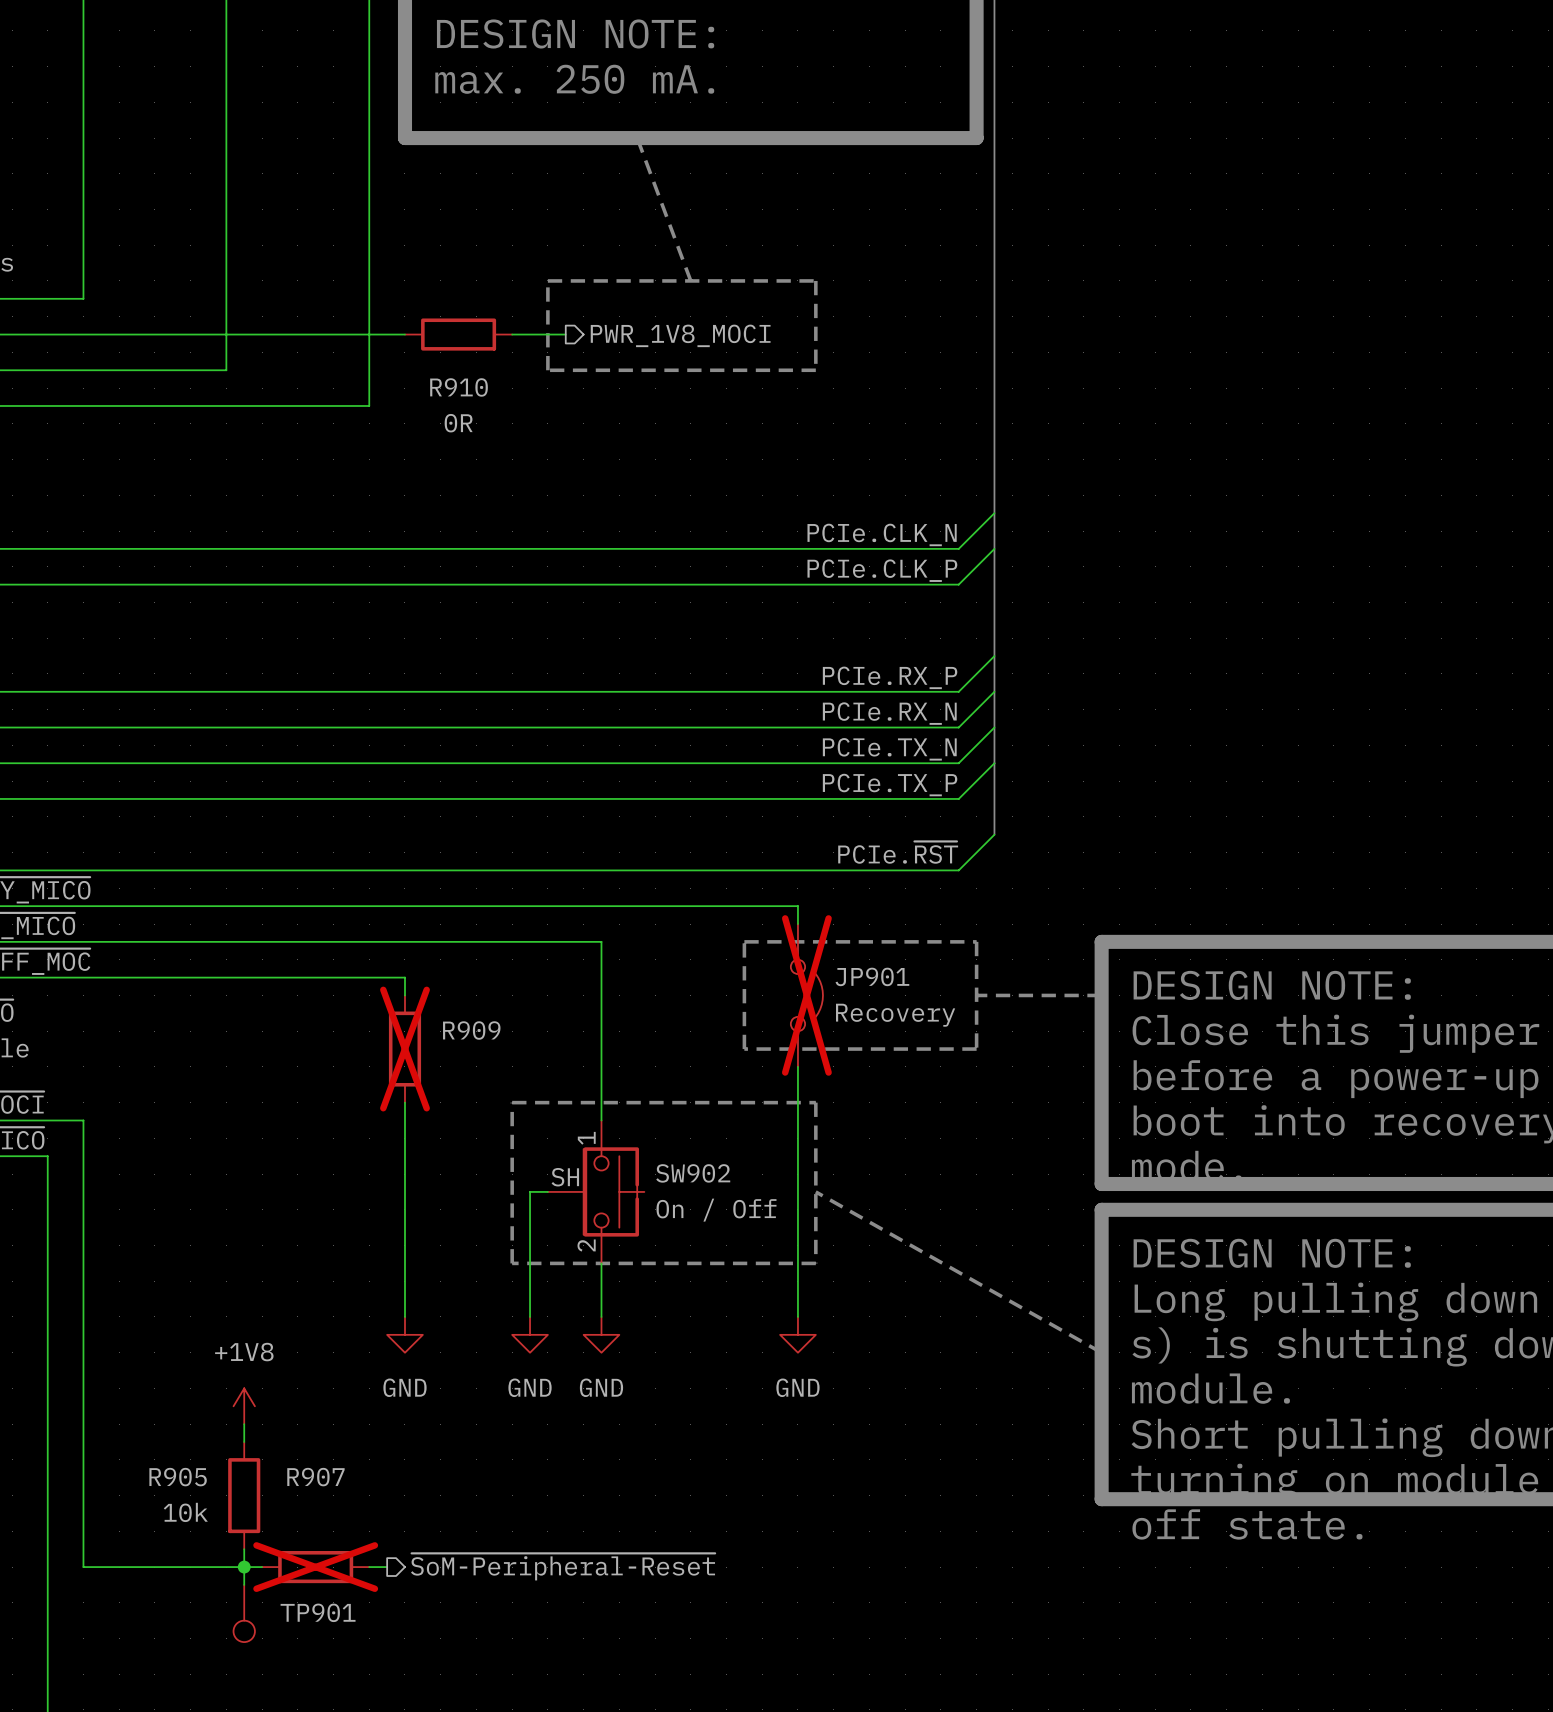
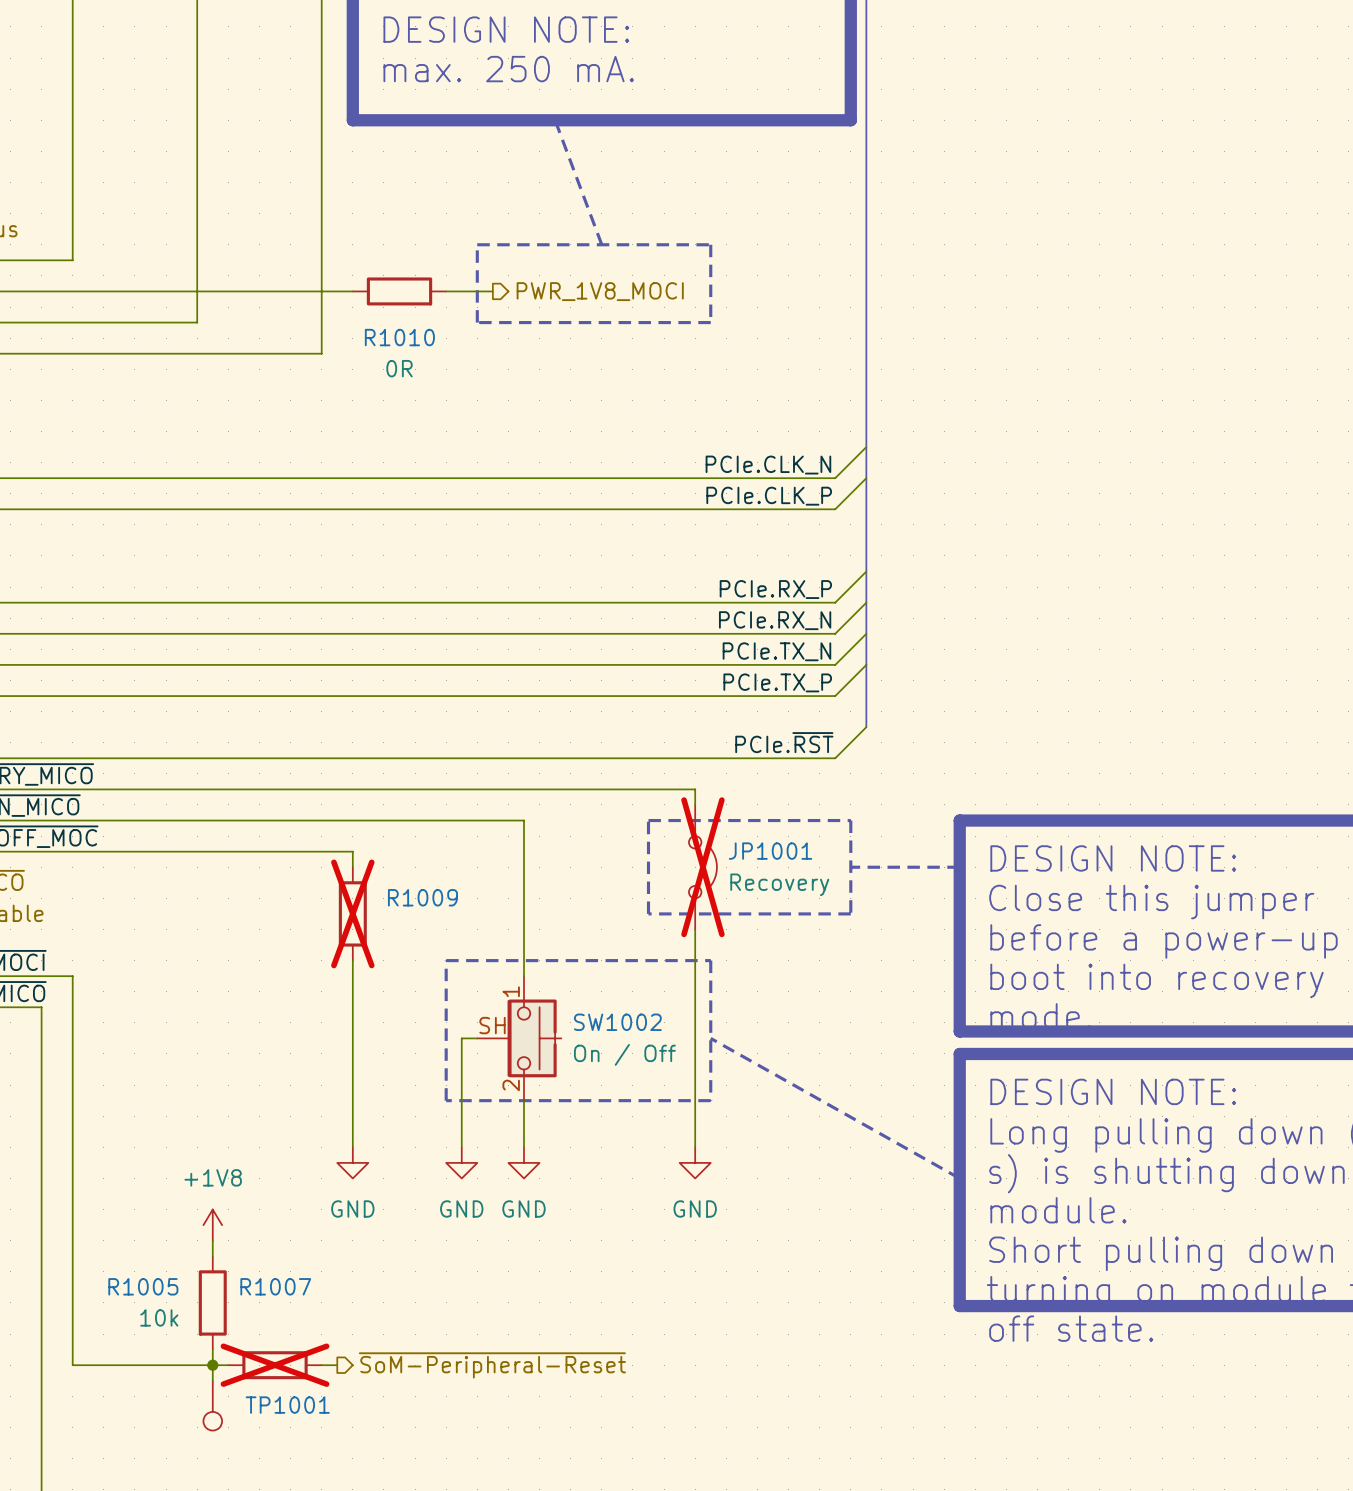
R910 name: R910 (459, 387) -> R1010 (399, 337)
JP901 name: JP901 (872, 976) -> JP1001 (770, 851)
R909 name: R909 (471, 1030) -> R1009 (422, 897)
SW902 name: SW902 (693, 1173) -> SW1002 (617, 1022)
R905 name: R905 (178, 1477) -> R1005 (143, 1286)
R907 name: R907 (315, 1477) -> R1007 (275, 1286)
TP901 name: TP901 (318, 1612) -> TP1001 (287, 1405)

